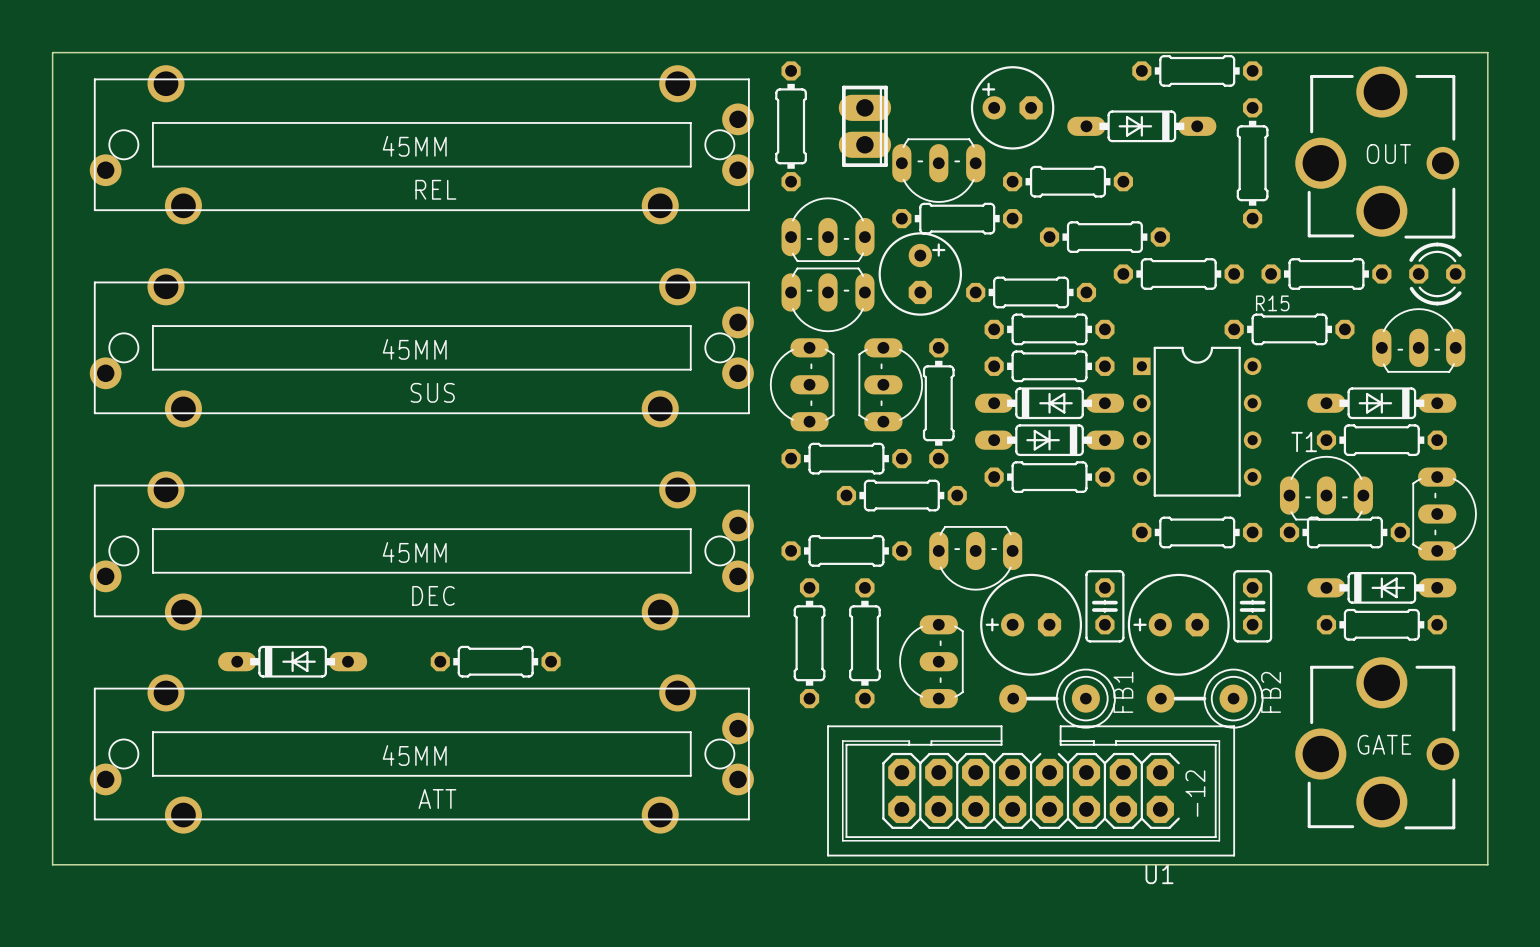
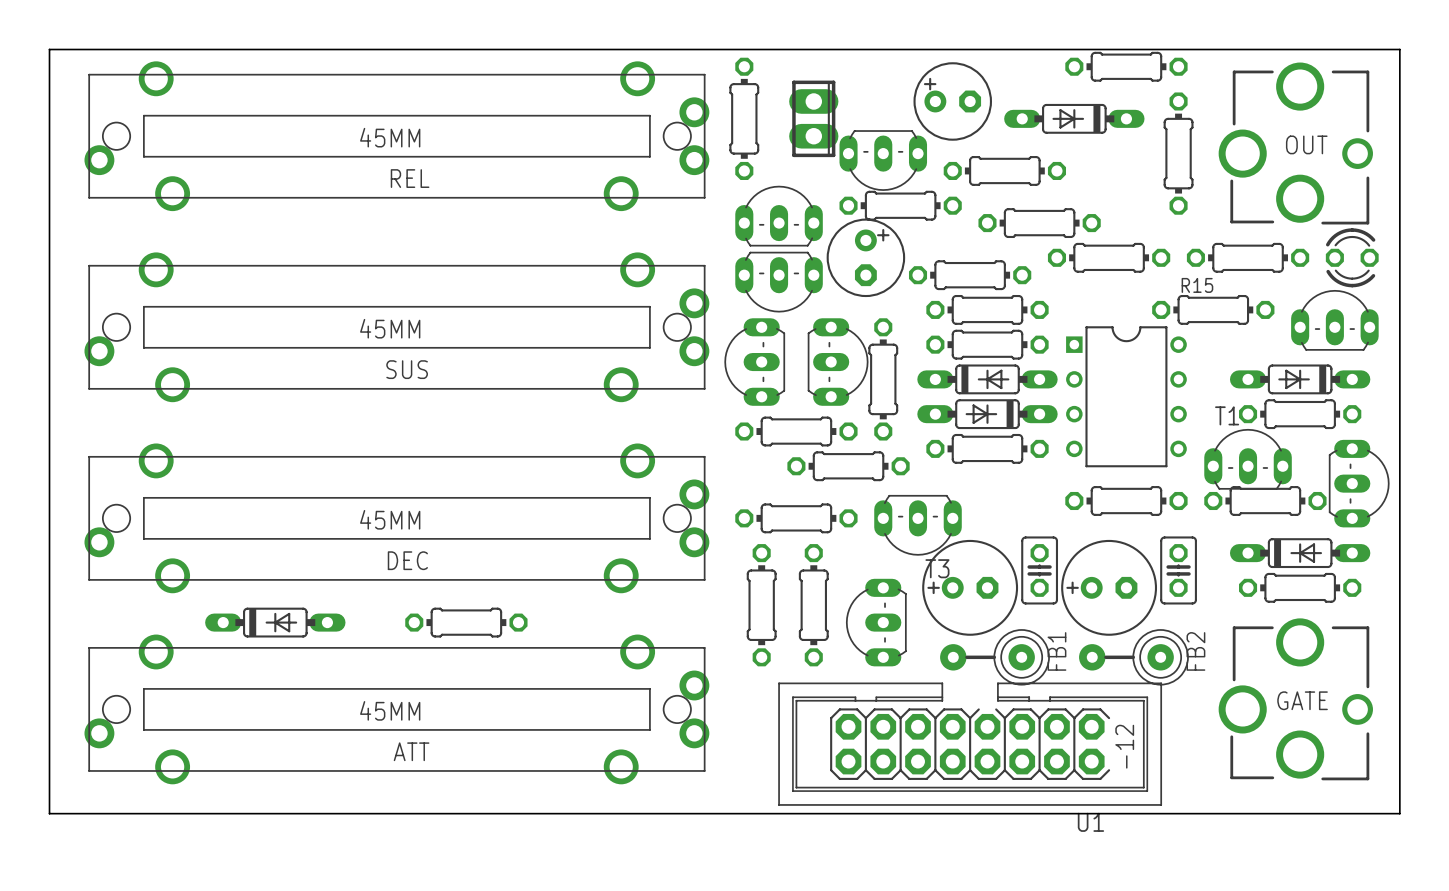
T3 name: none -> T3 (937, 568)

